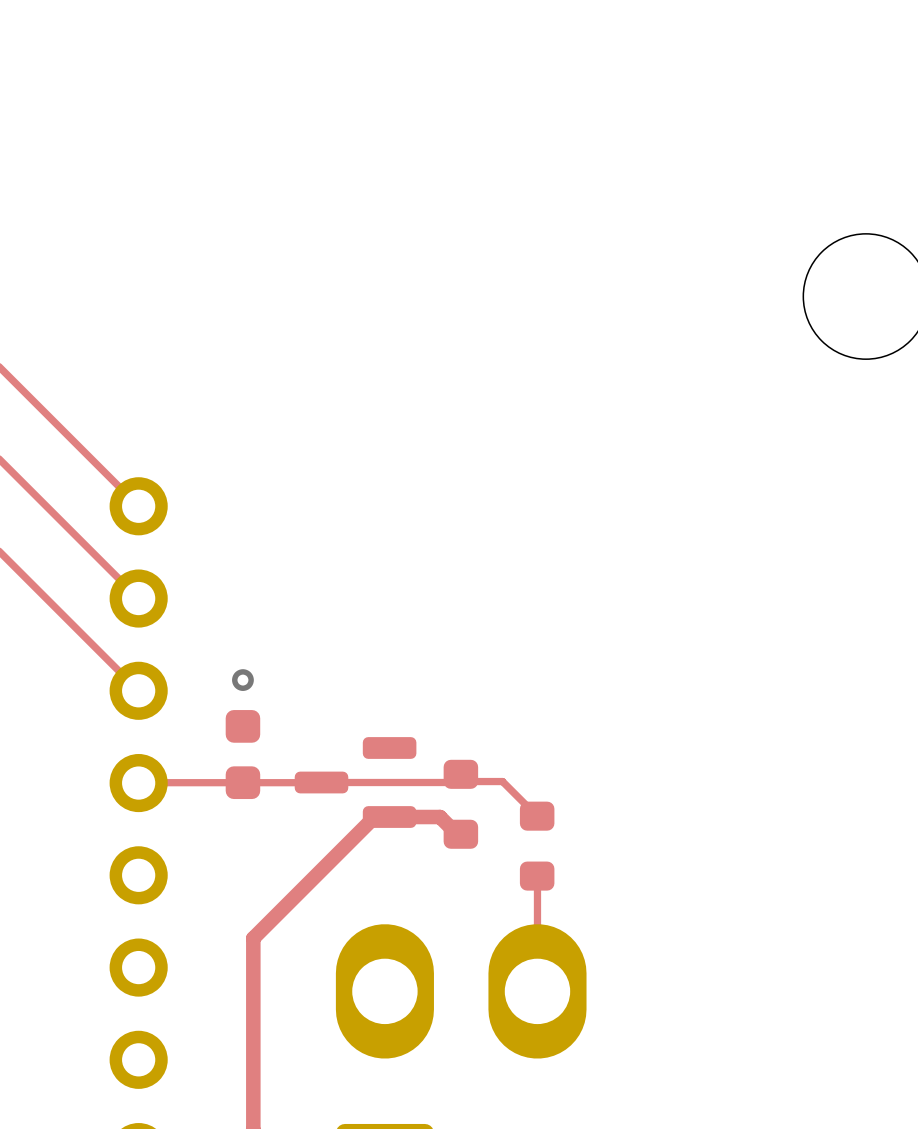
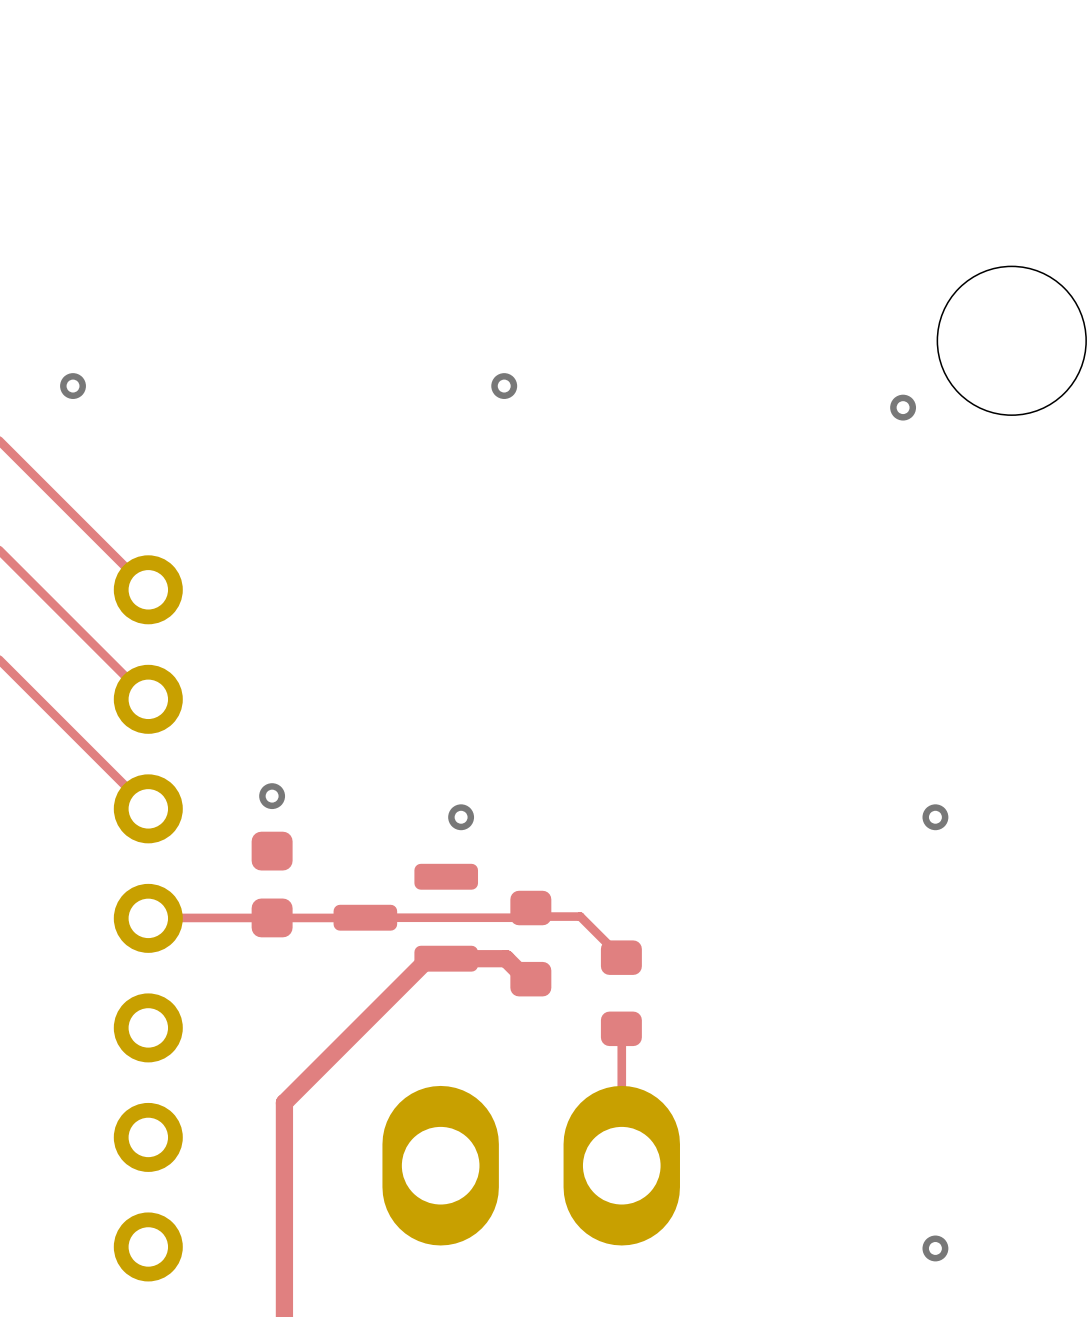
via: none -> (73, 386)
via: none -> (504, 386)
via: none -> (903, 407)
via: none -> (461, 817)
via: none -> (935, 817)
via: none -> (935, 1248)

